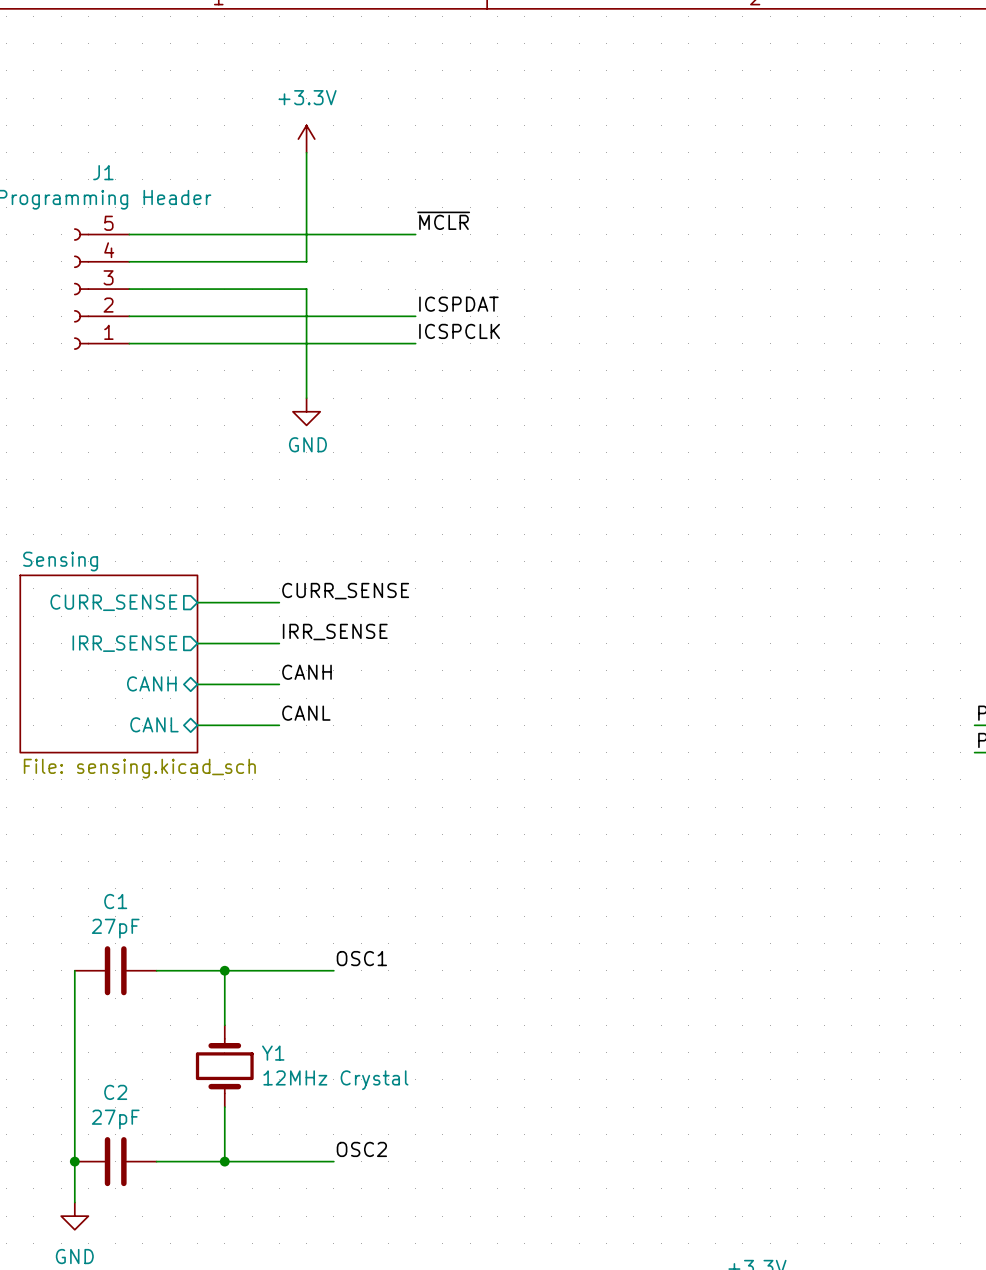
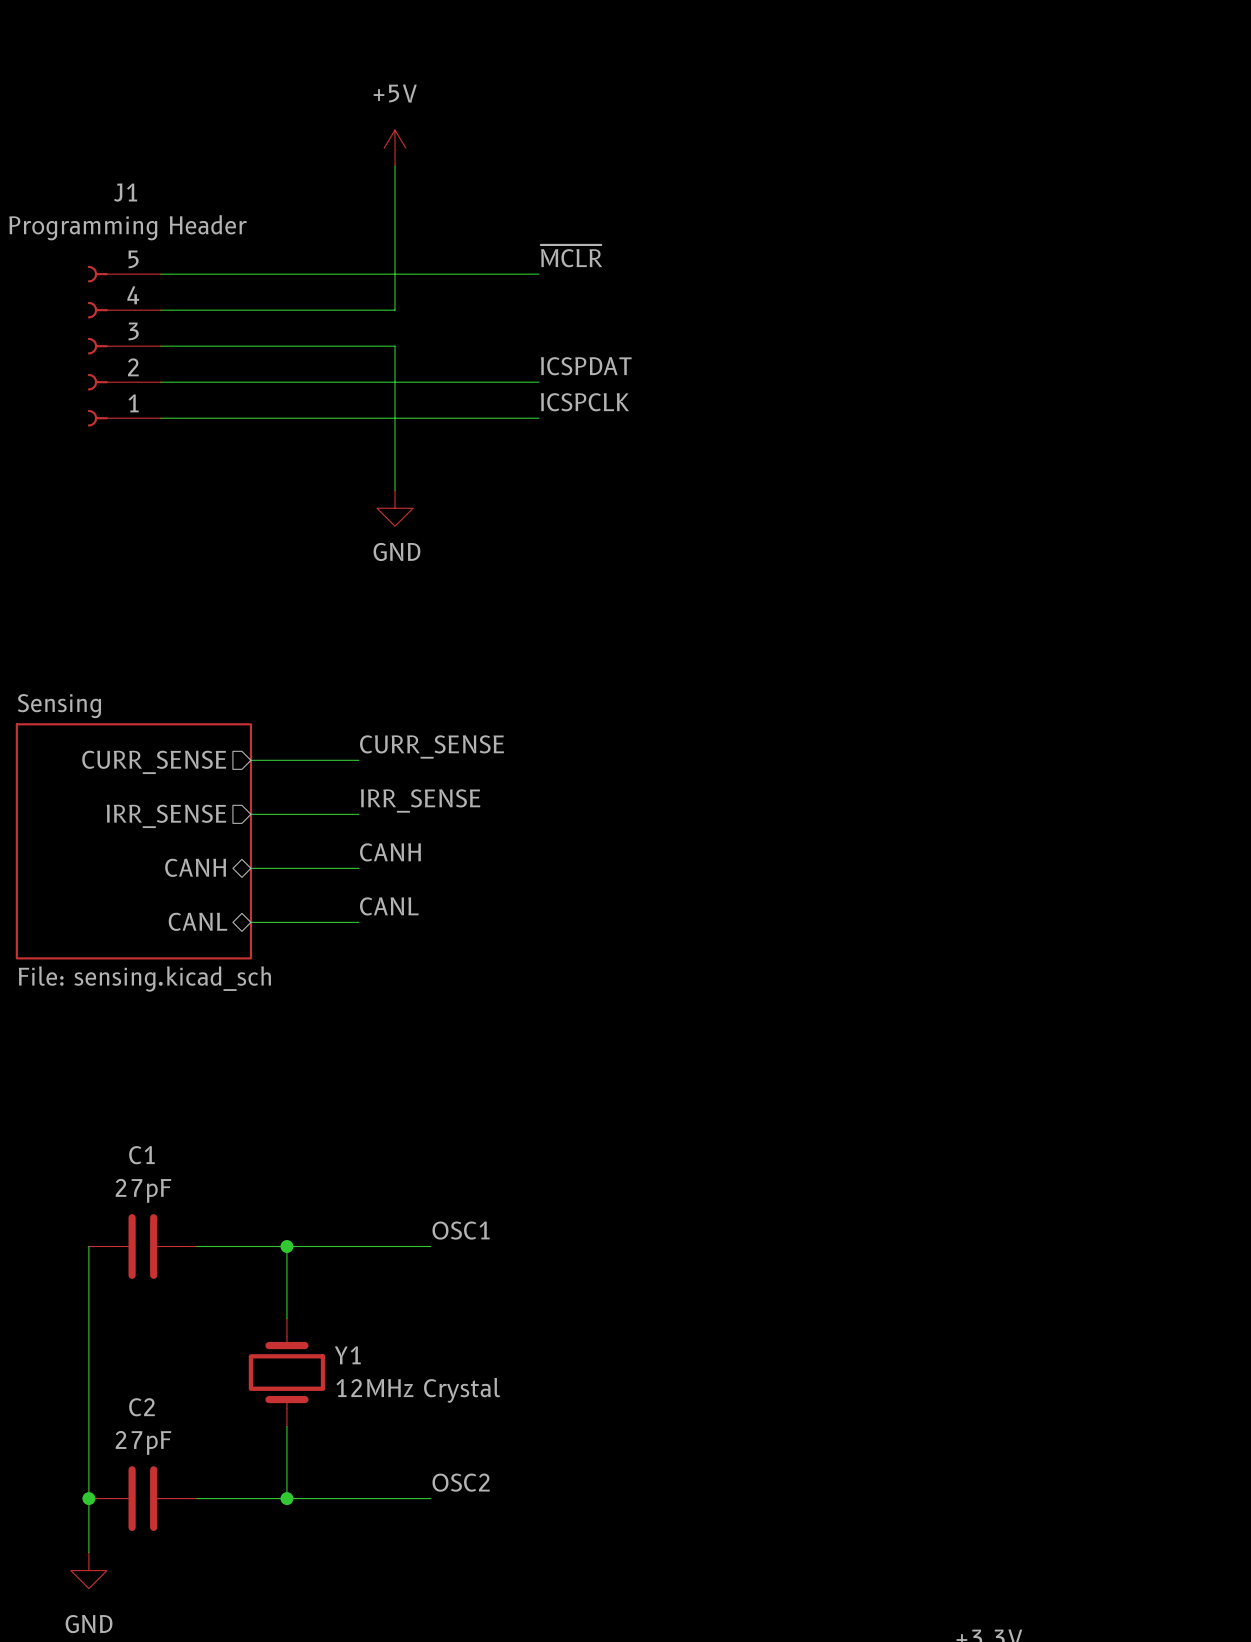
power symbol: +3.3V (306, 139) -> +5V (394, 148)

